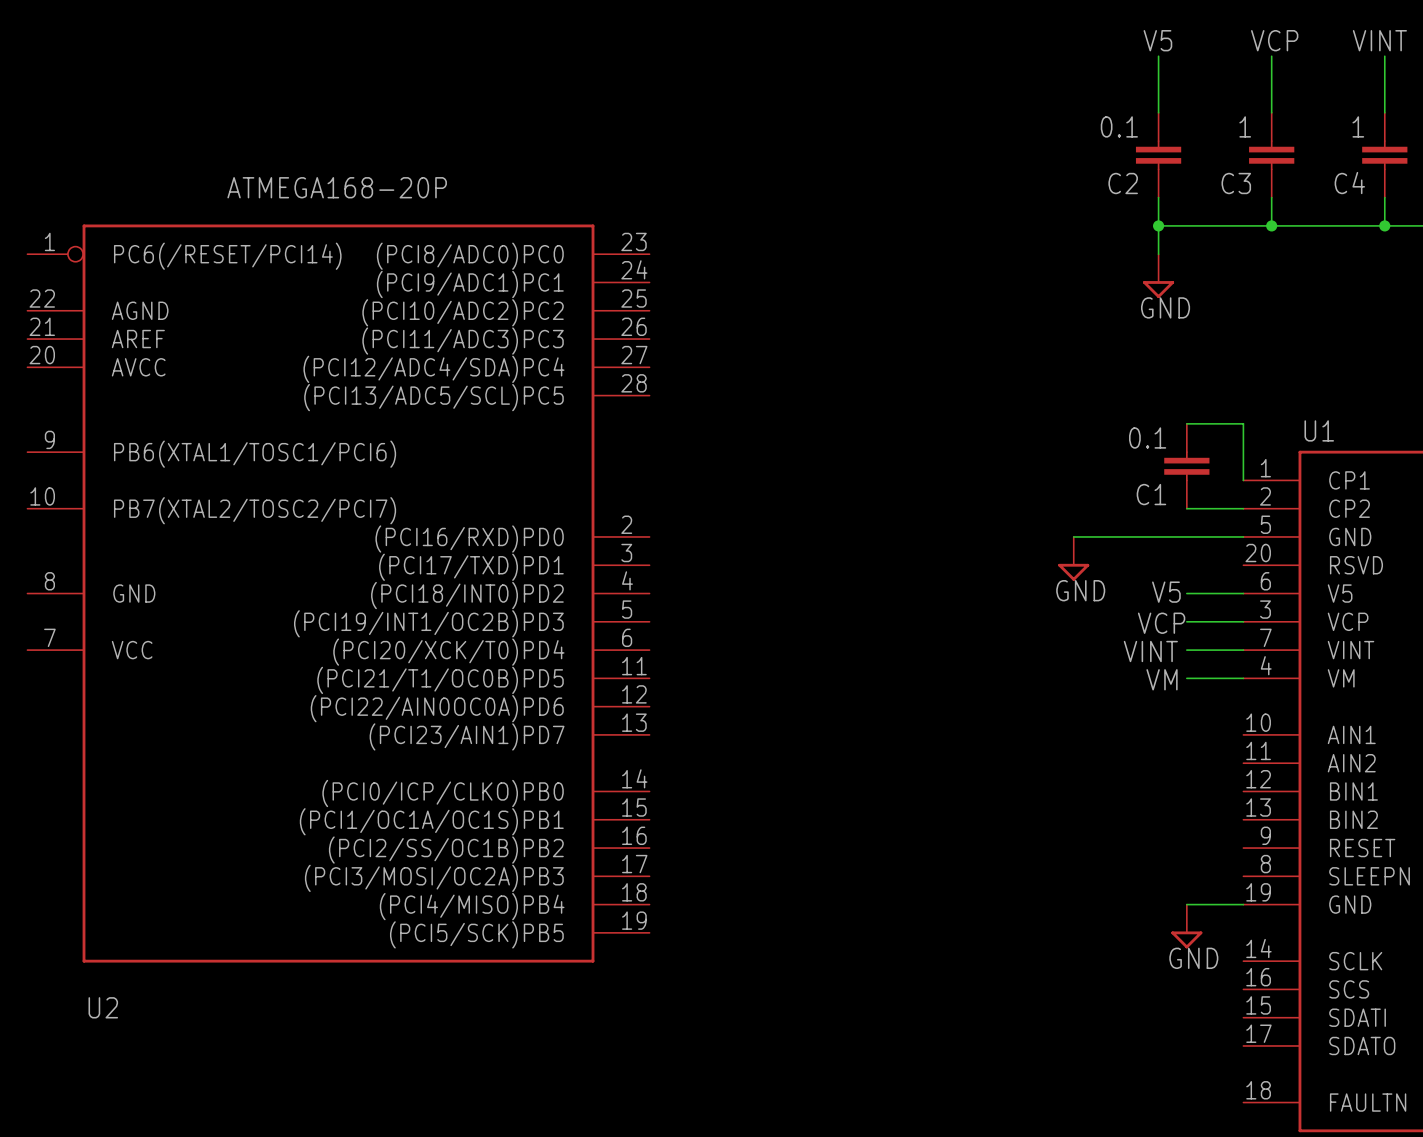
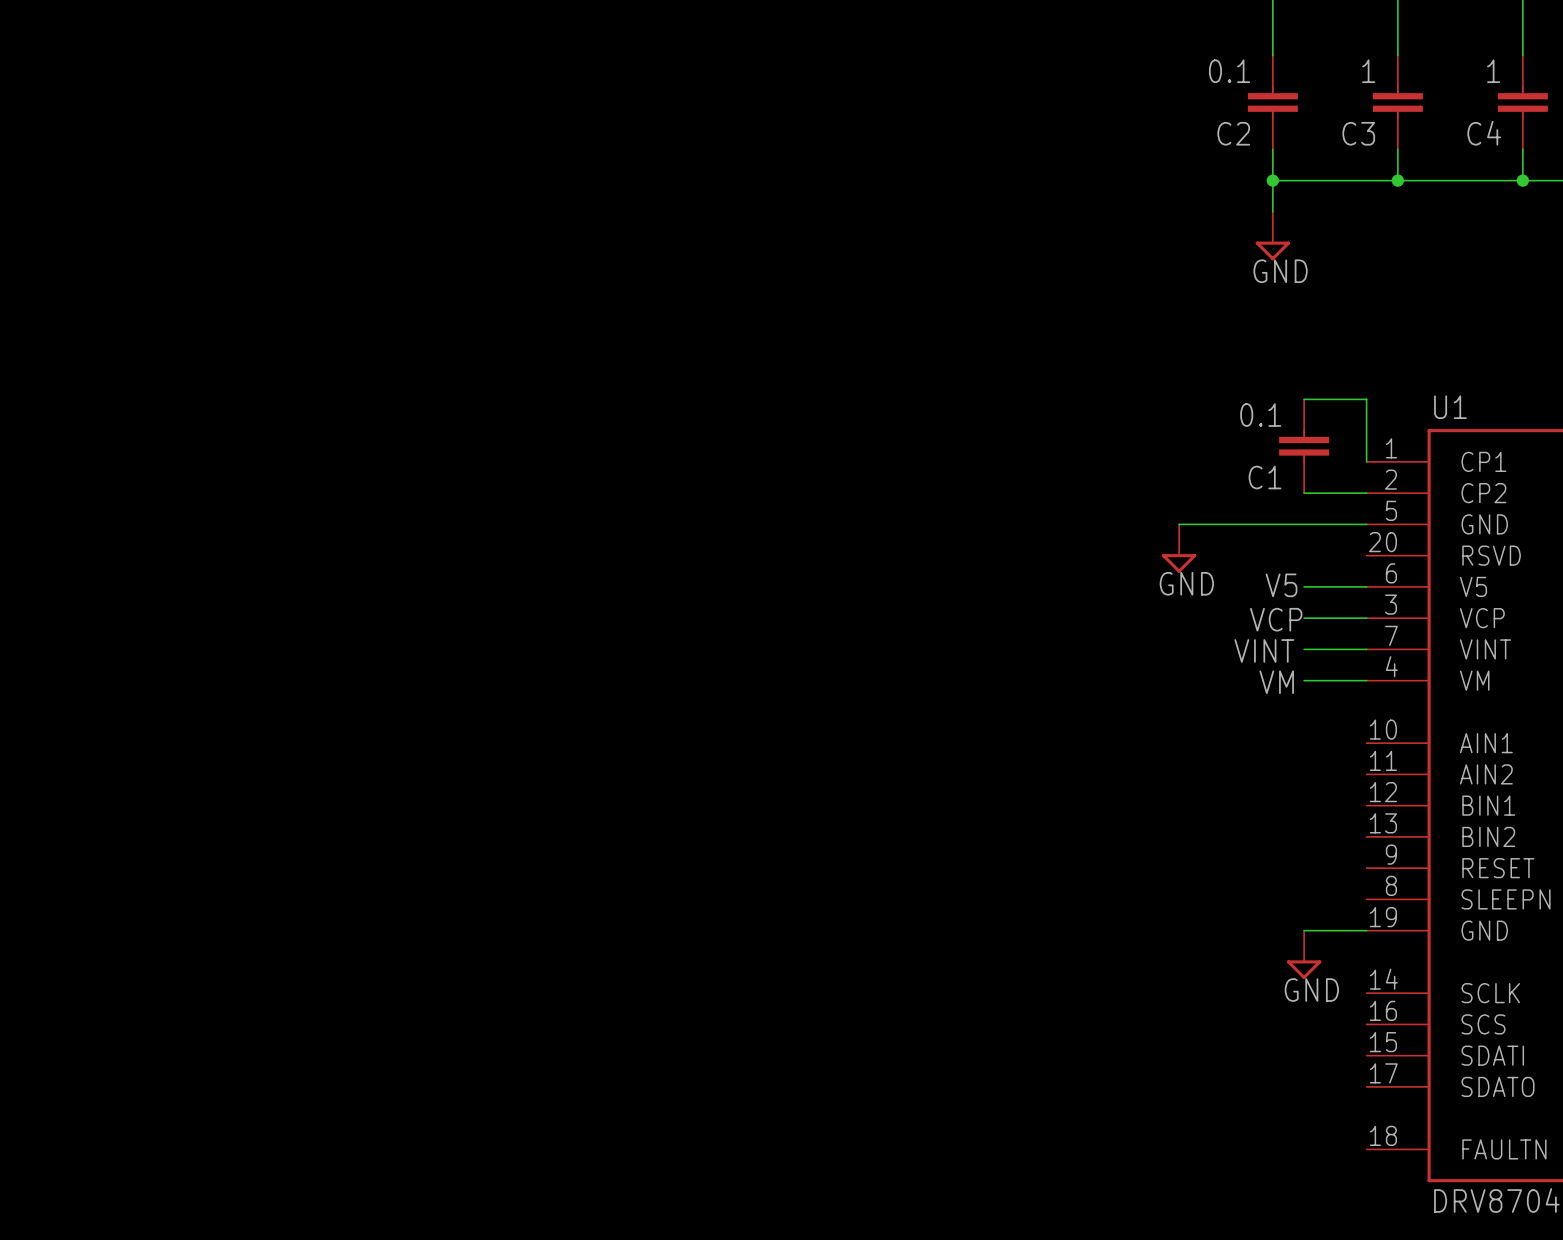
U2: ATMEGA168-20P (338, 593) -> none

